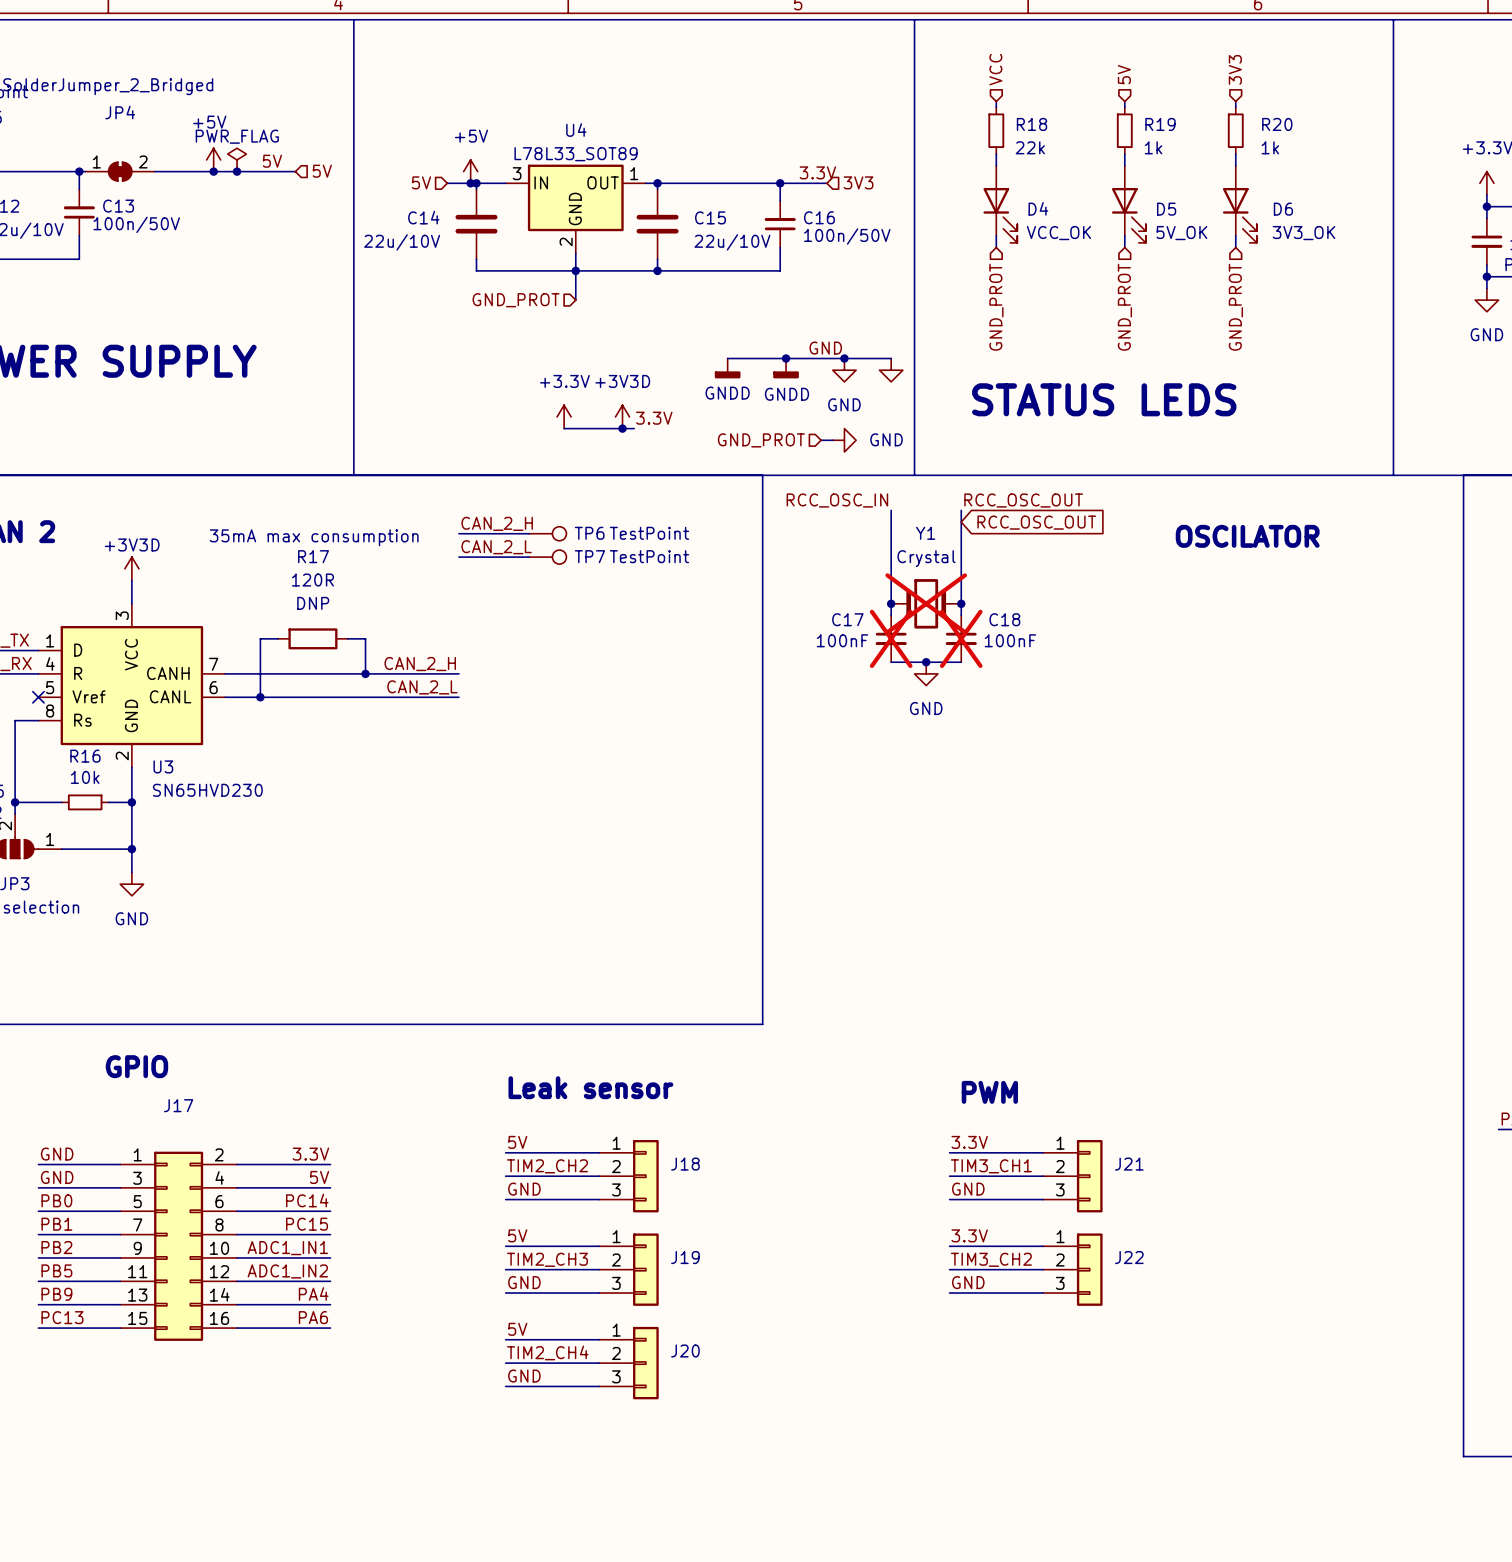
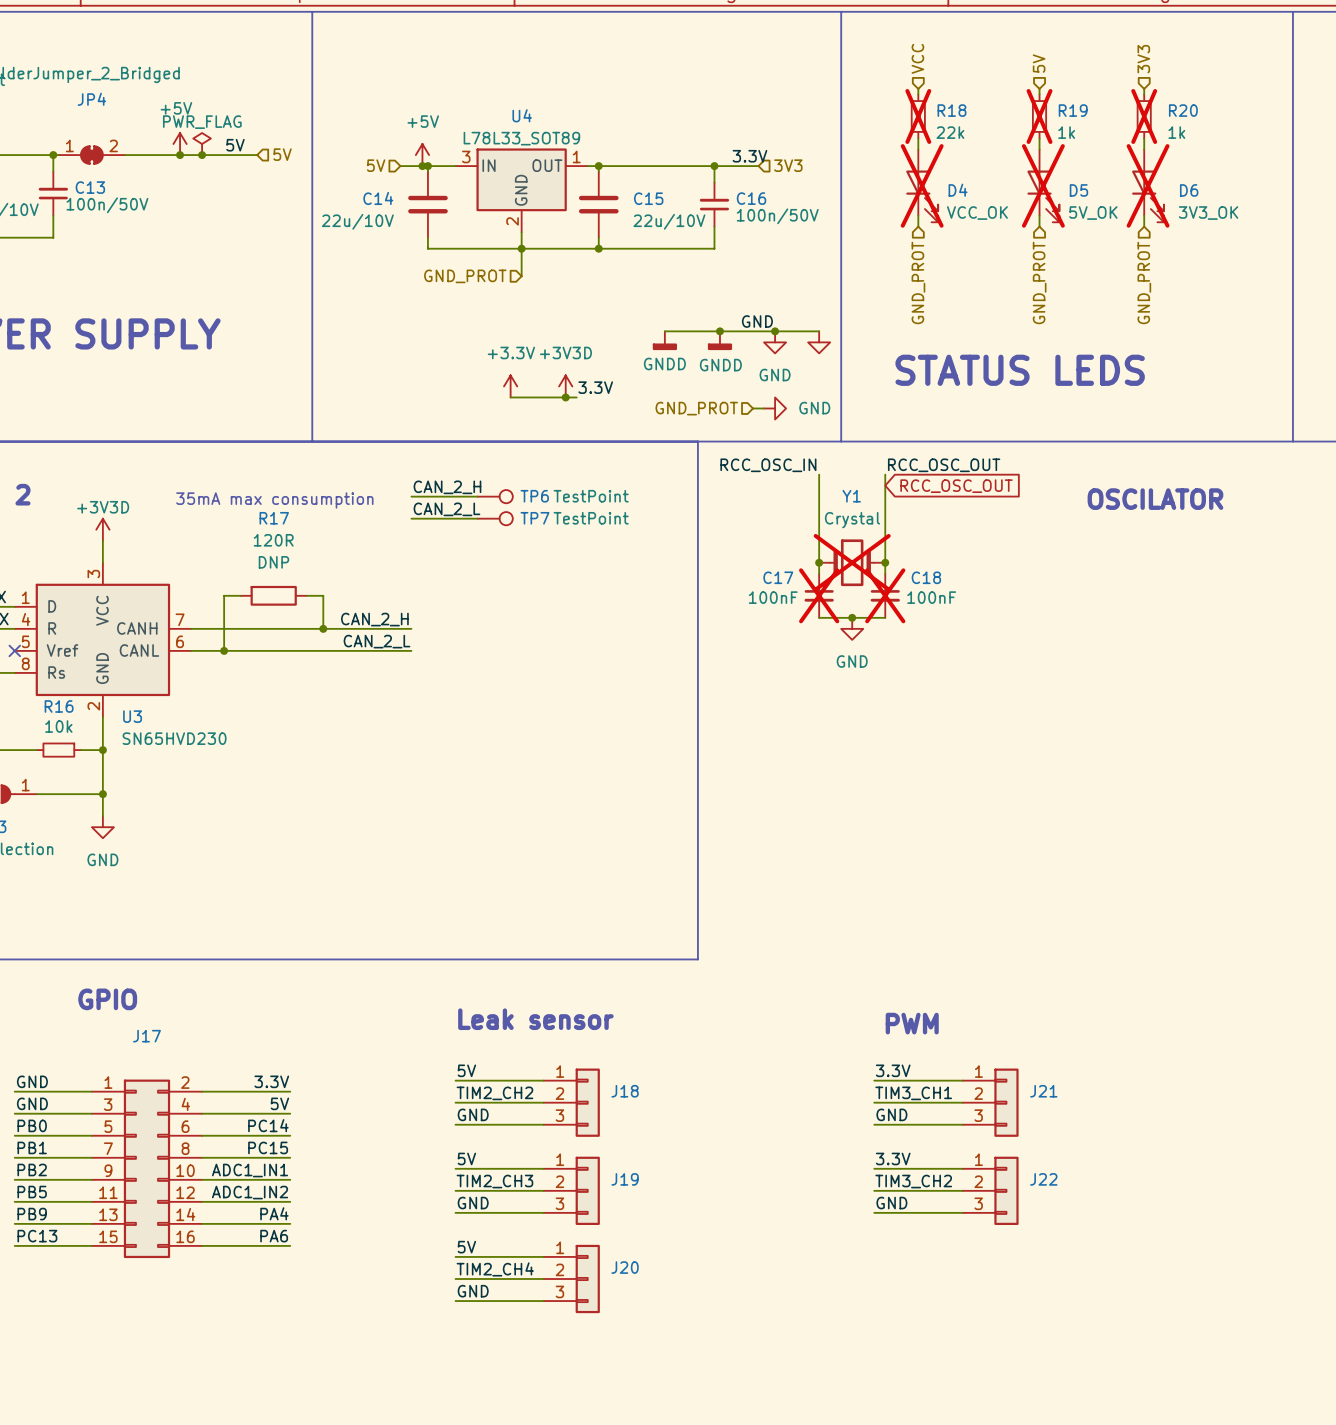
R18 do-not-place cross: none -> (918, 116)
R19 do-not-place cross: none -> (1039, 116)
R20 do-not-place cross: none -> (1144, 116)
D4 do-not-place cross: none -> (922, 185)
D5 do-not-place cross: none -> (1043, 185)
D6 do-not-place cross: none -> (1148, 185)

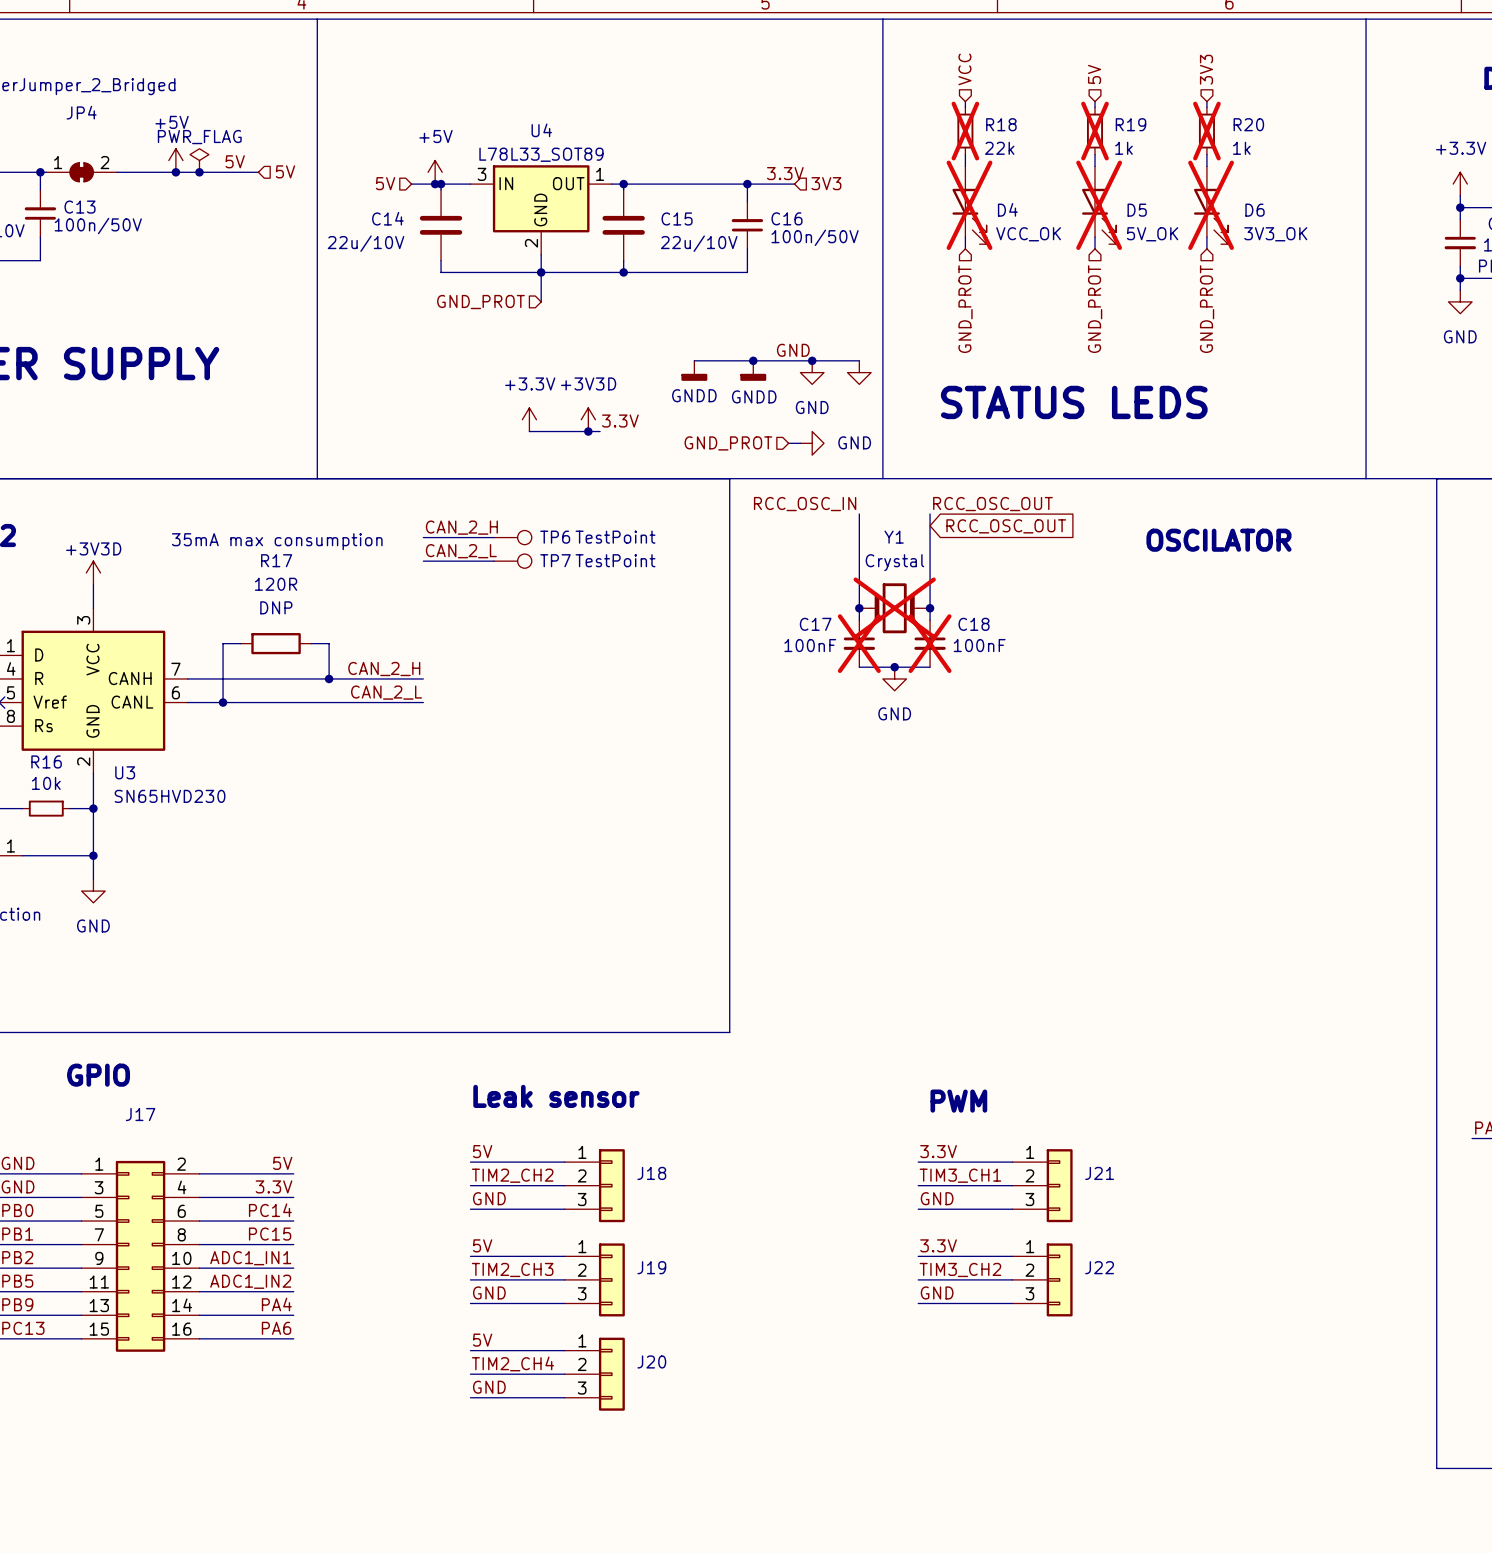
label: 3.3V (271, 1081) -> 5V (282, 1163)
label: 5V (279, 1103) -> 3.3V (274, 1186)

